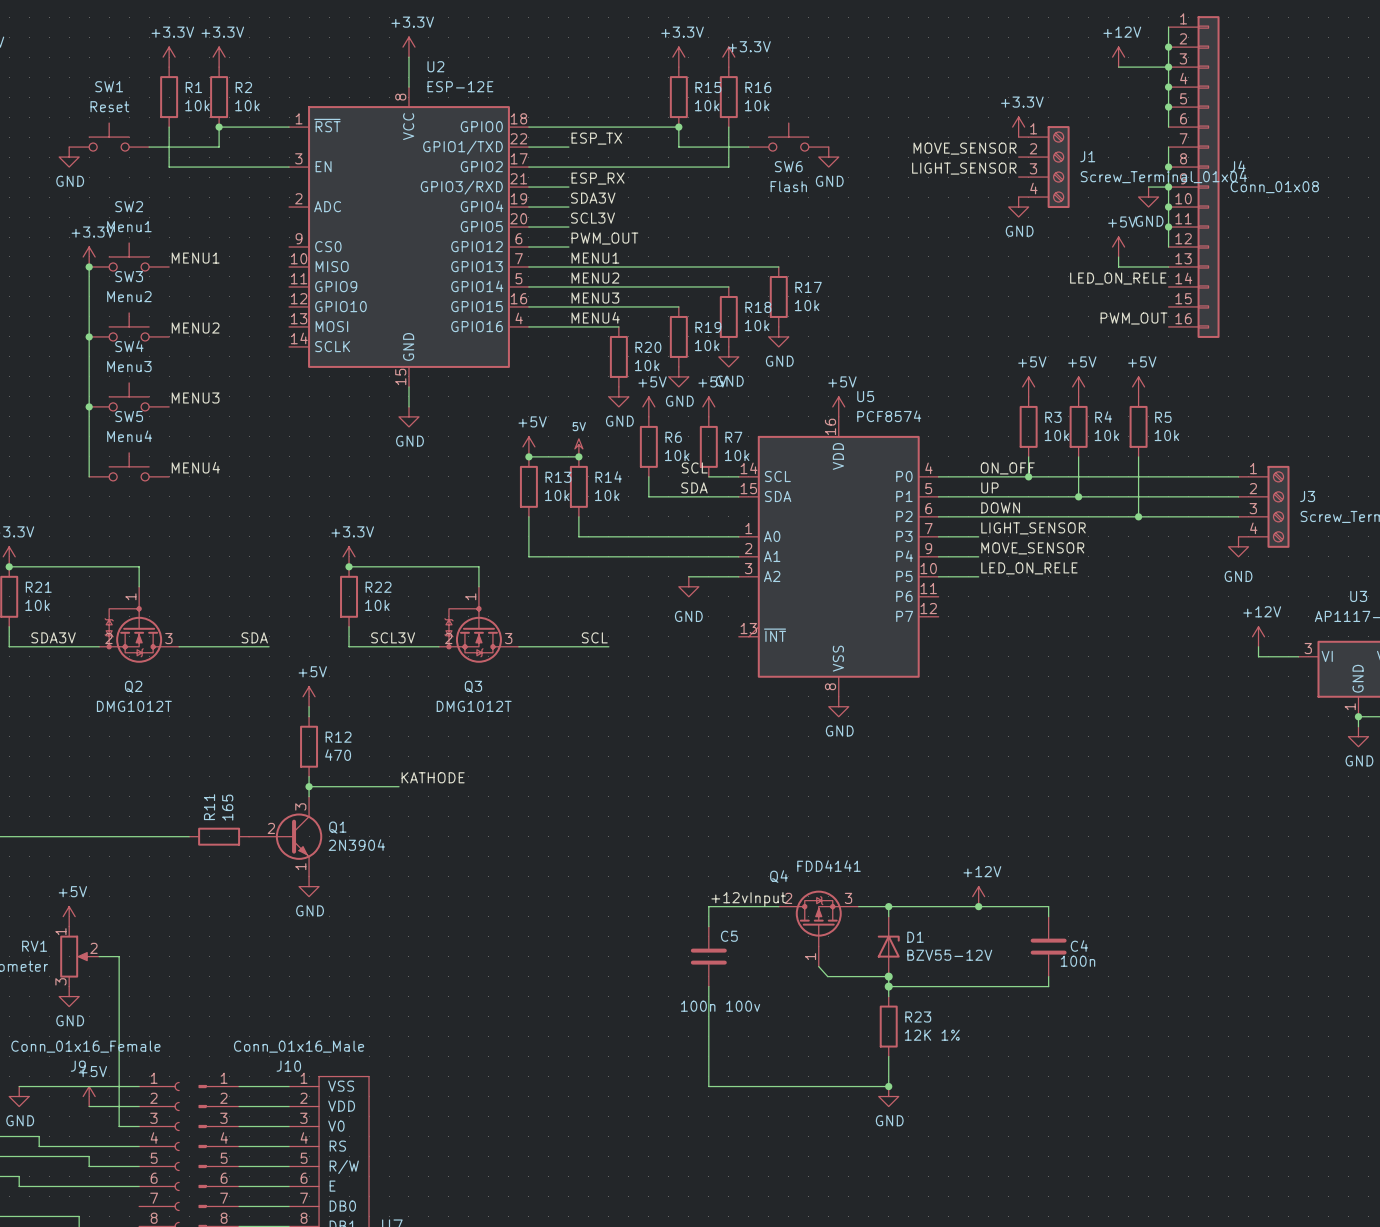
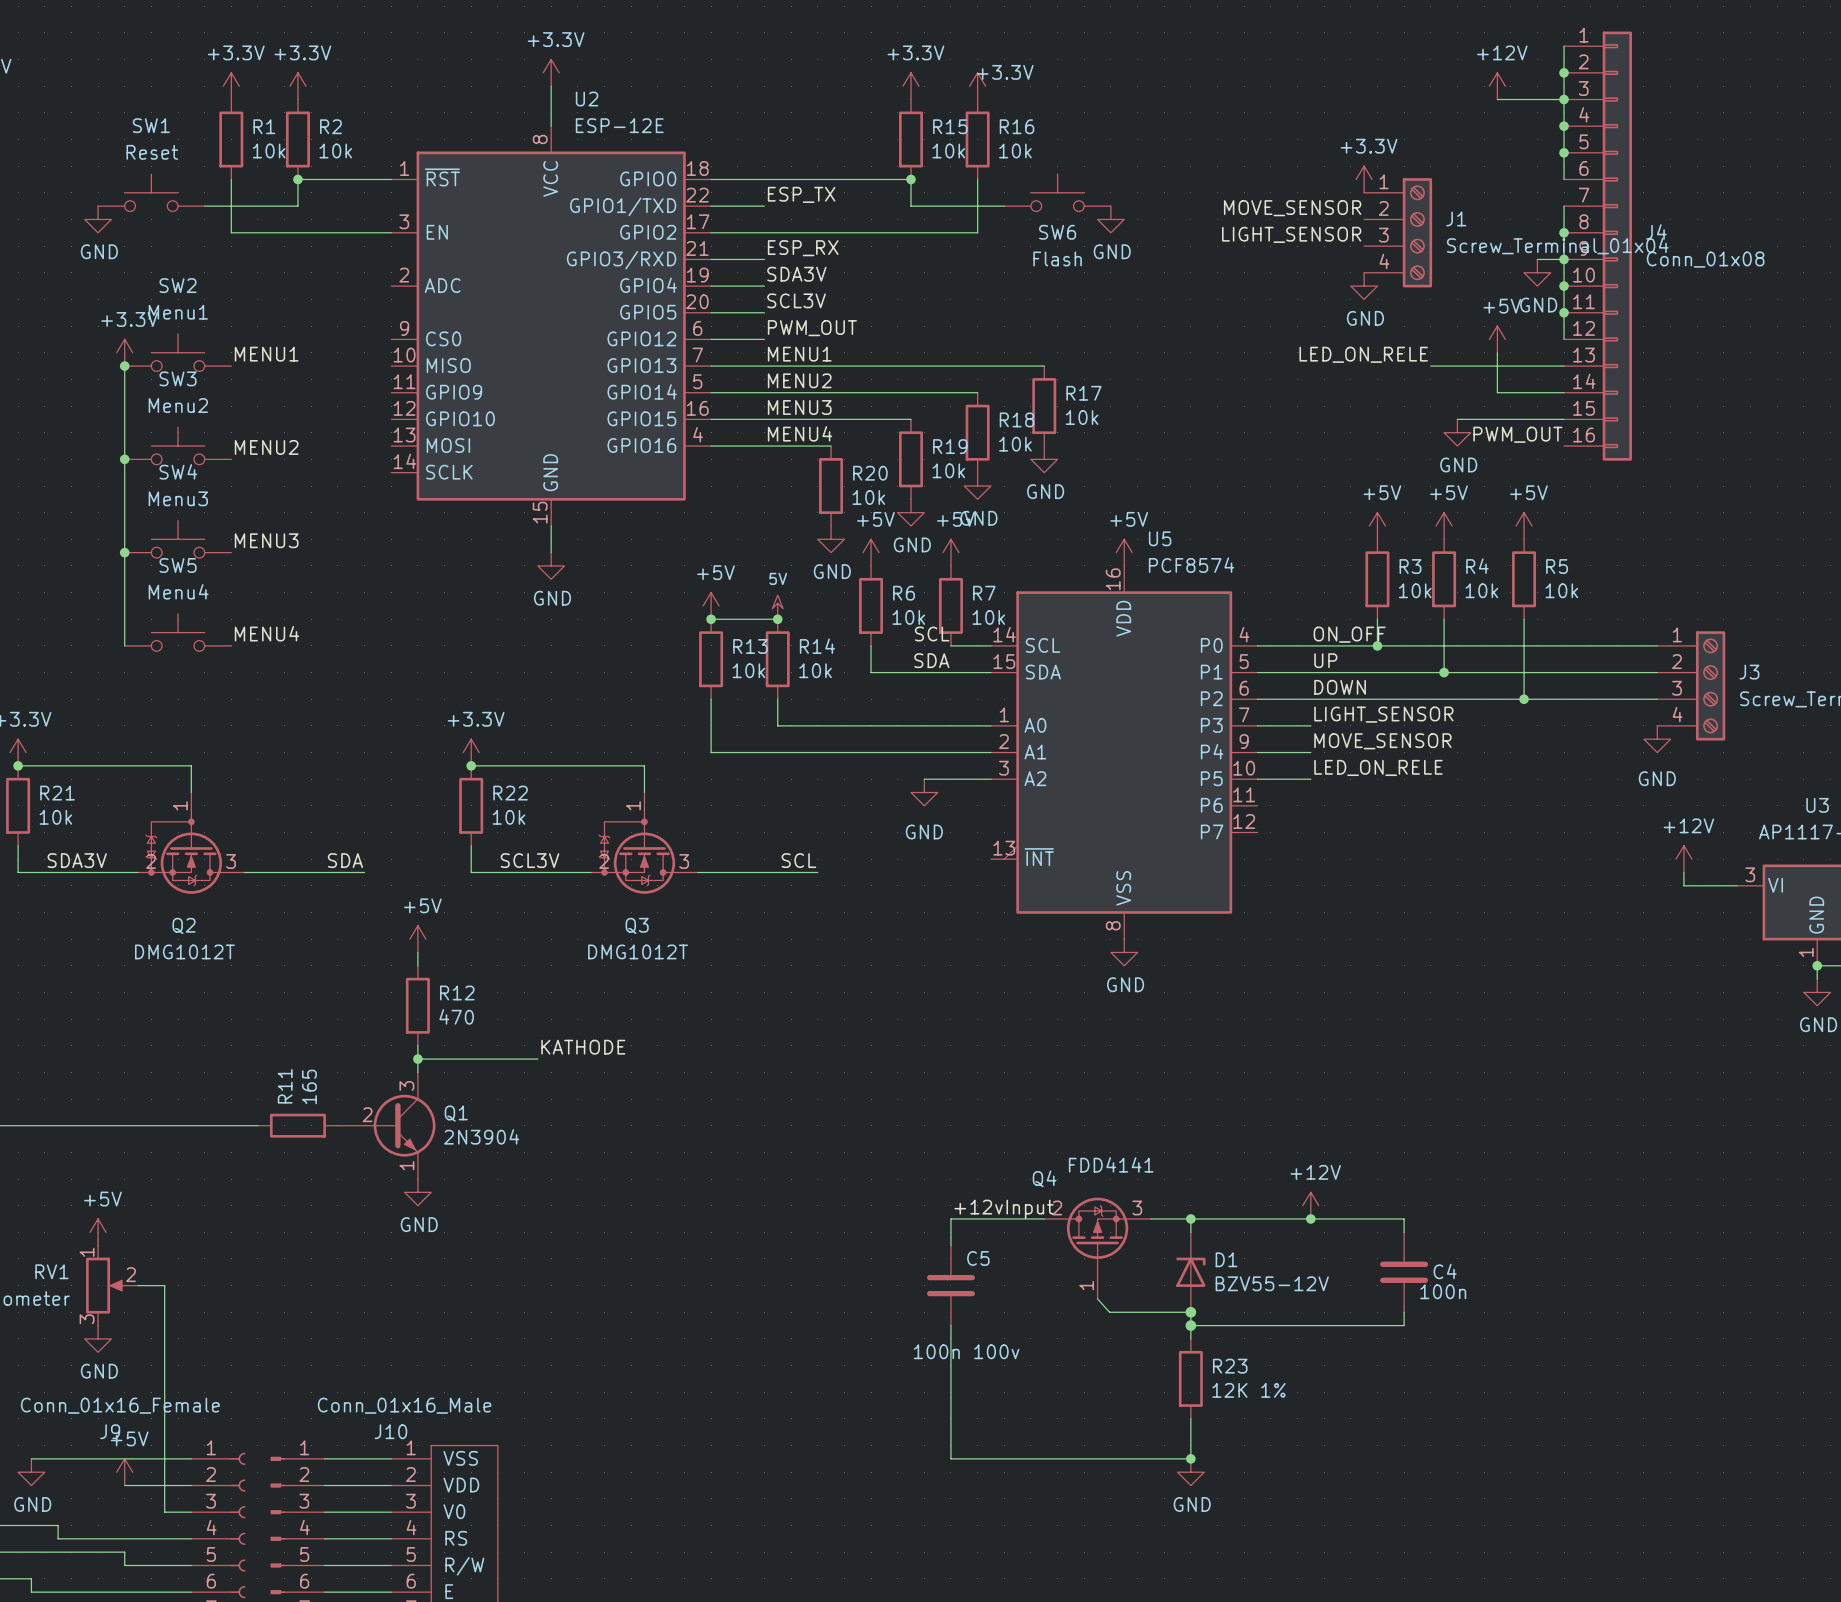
wire: none -> (1430, 366) (1497, 366) (1497, 392) (1564, 392)
label position: LED_ON_RELE (1118, 278) -> LED_ON_RELE (1363, 354)
wire: none -> (1457, 419) (1564, 419)
power symbol: none -> GND (1457, 432)

